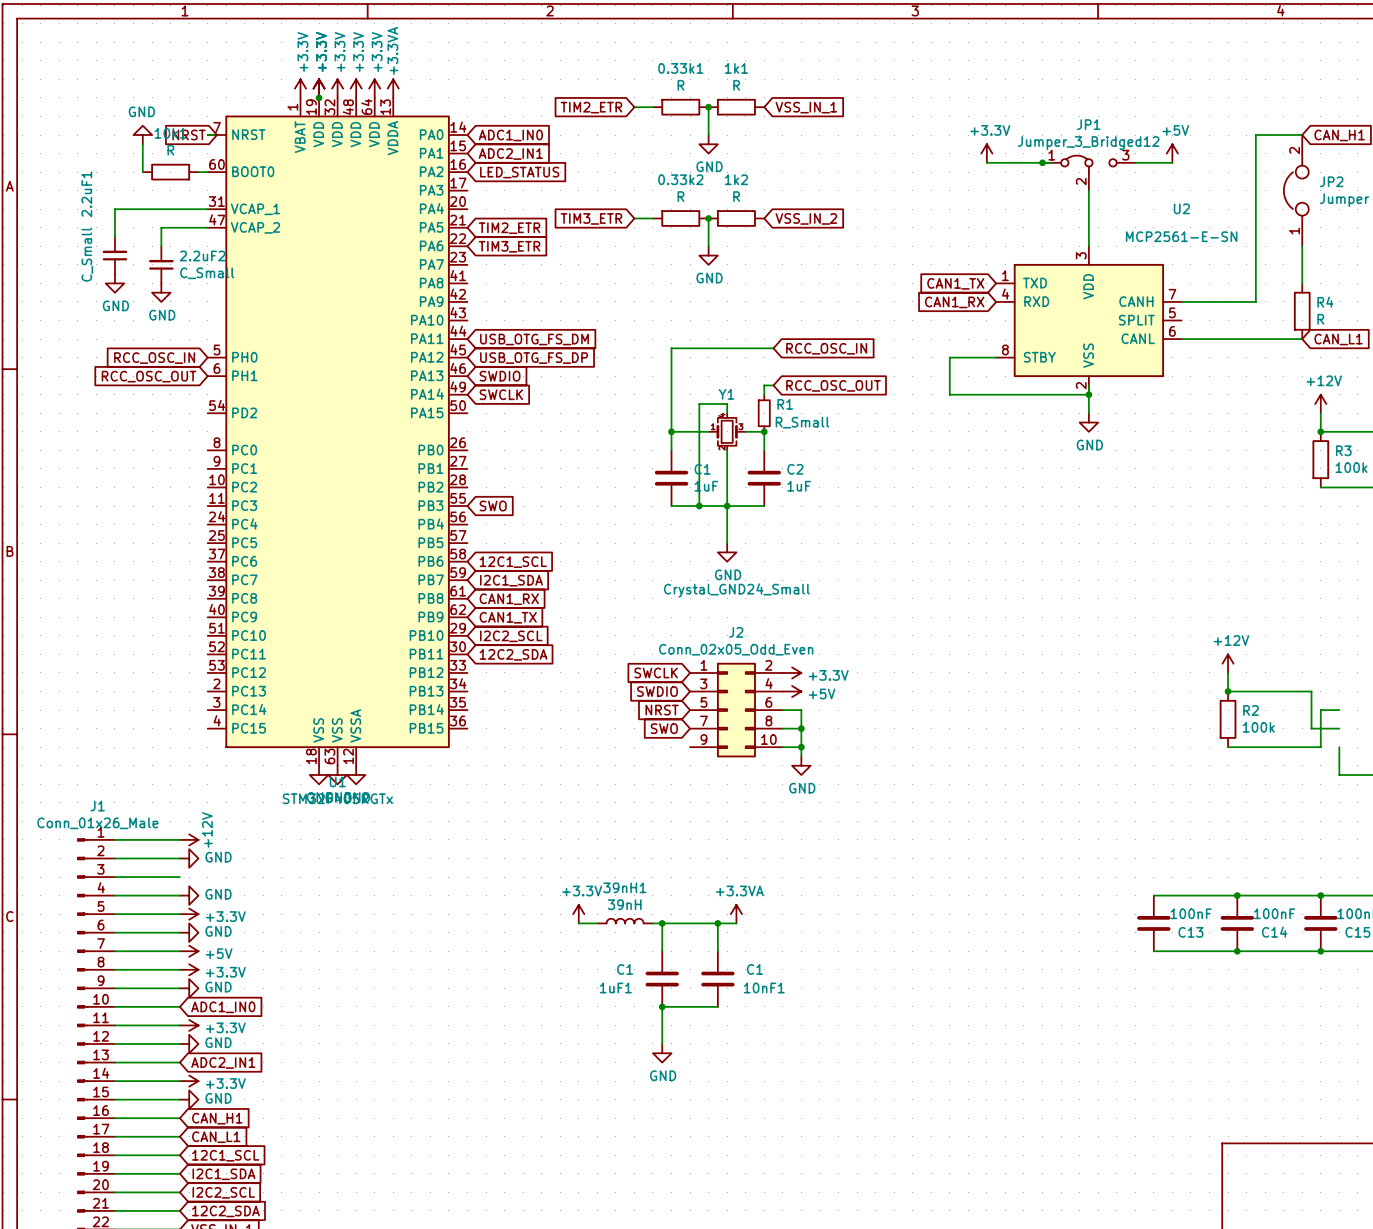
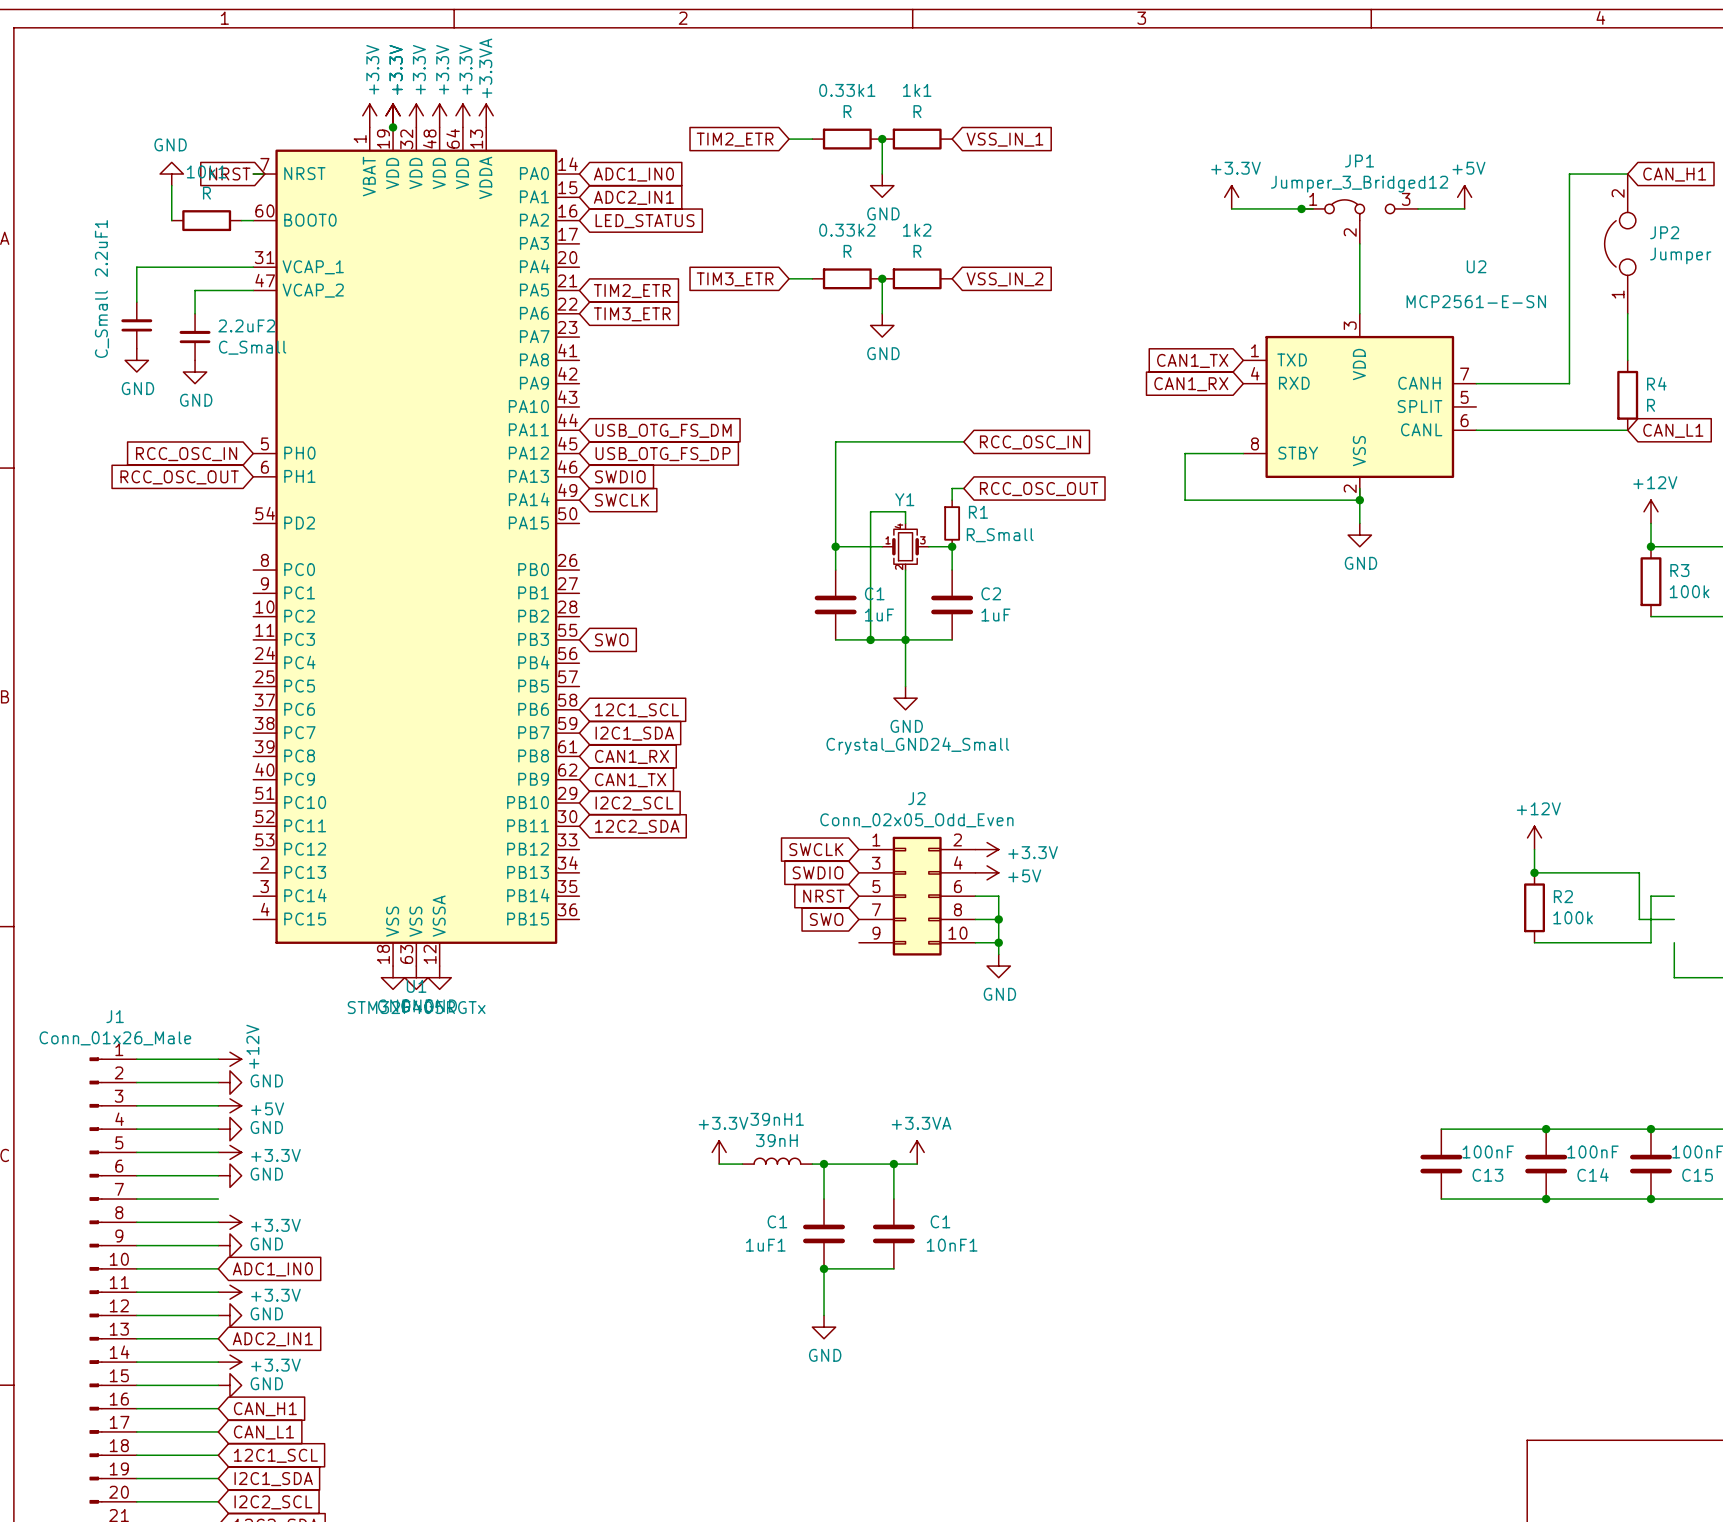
power symbol position: +5V (189, 951) -> +5V (229, 1105)

